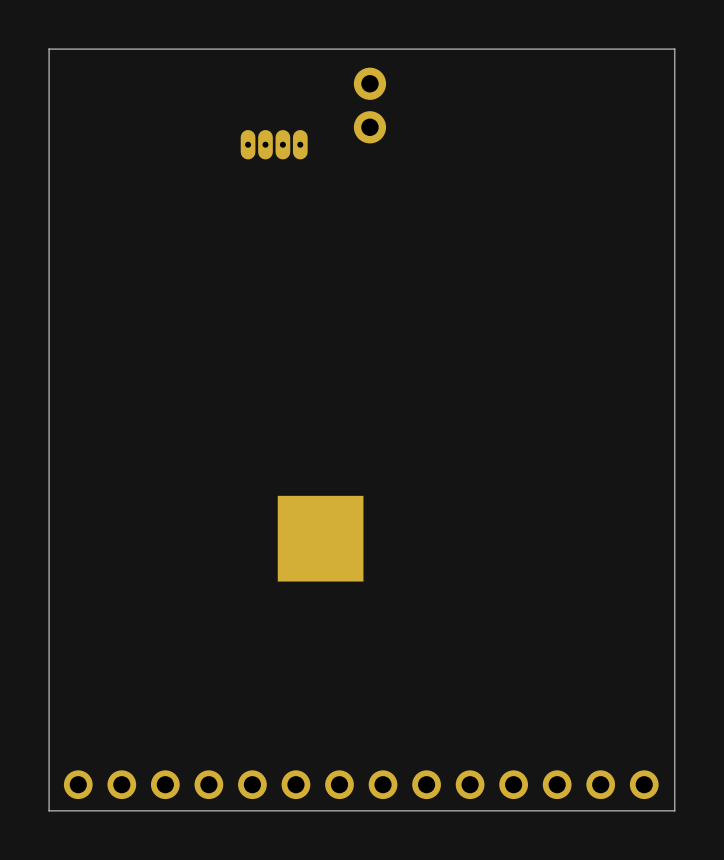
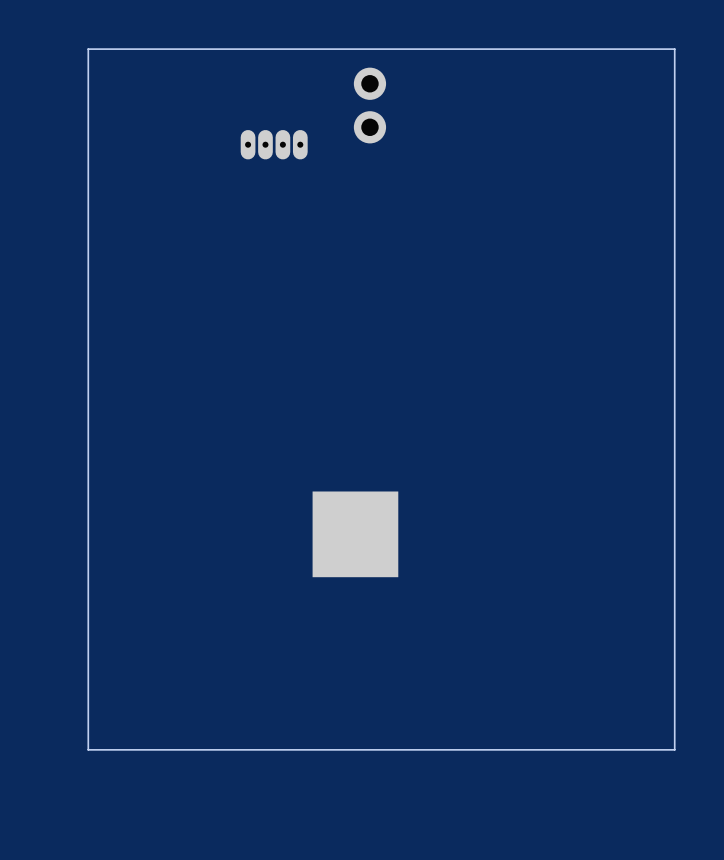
board edge: (88, 49) (49, 49) (49, 810) (674, 810) (674, 749) -> (88, 49) (88, 749) (674, 749)
part position: (320, 538) -> (355, 534)
part: (361, 784) -> none

